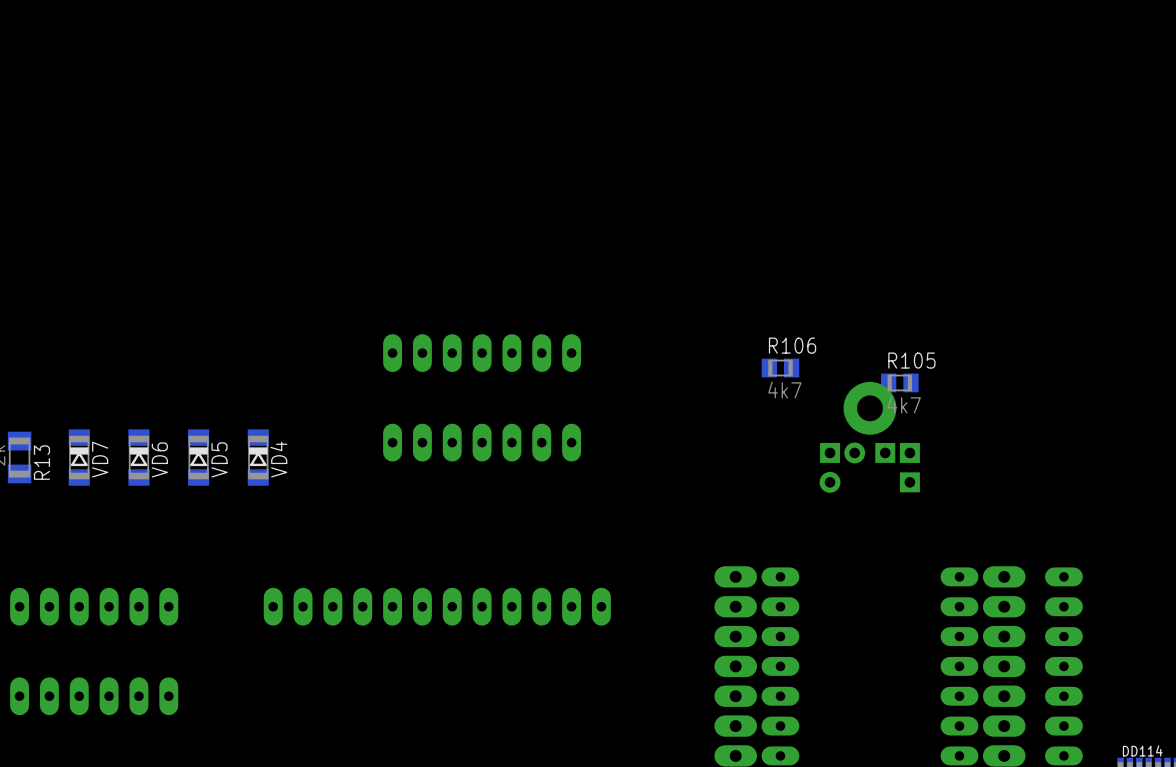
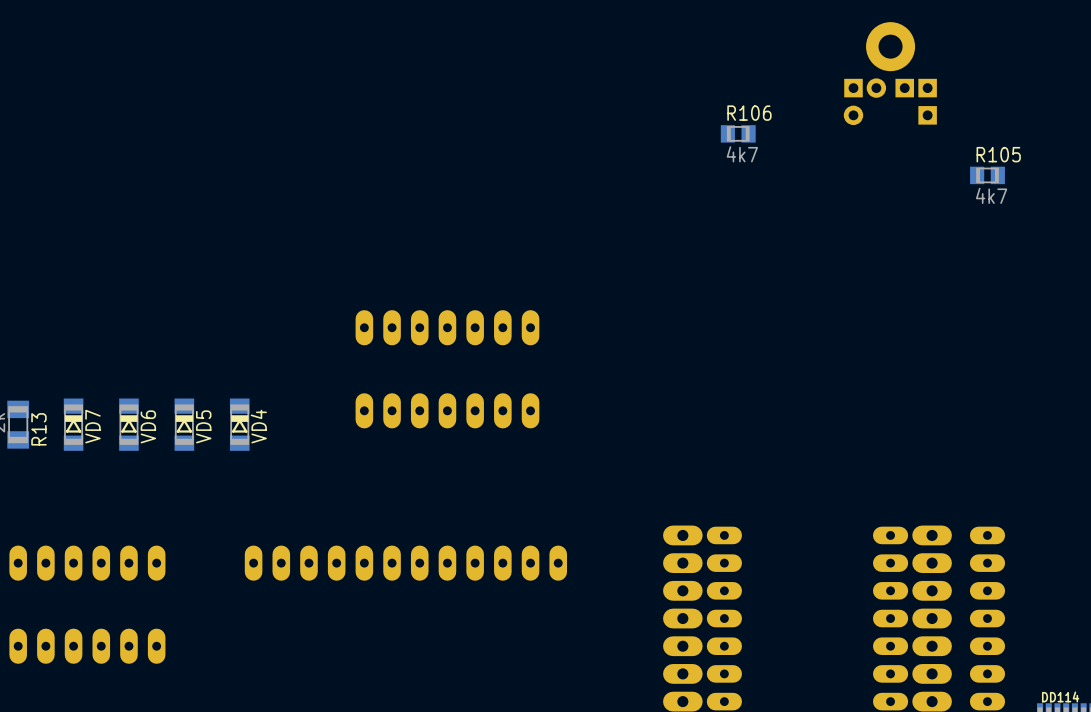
part: none -> (890, 73)
R106 position: (780, 368) -> (738, 133)
R105 position: (899, 382) -> (987, 175)
part: (869, 437) -> none

